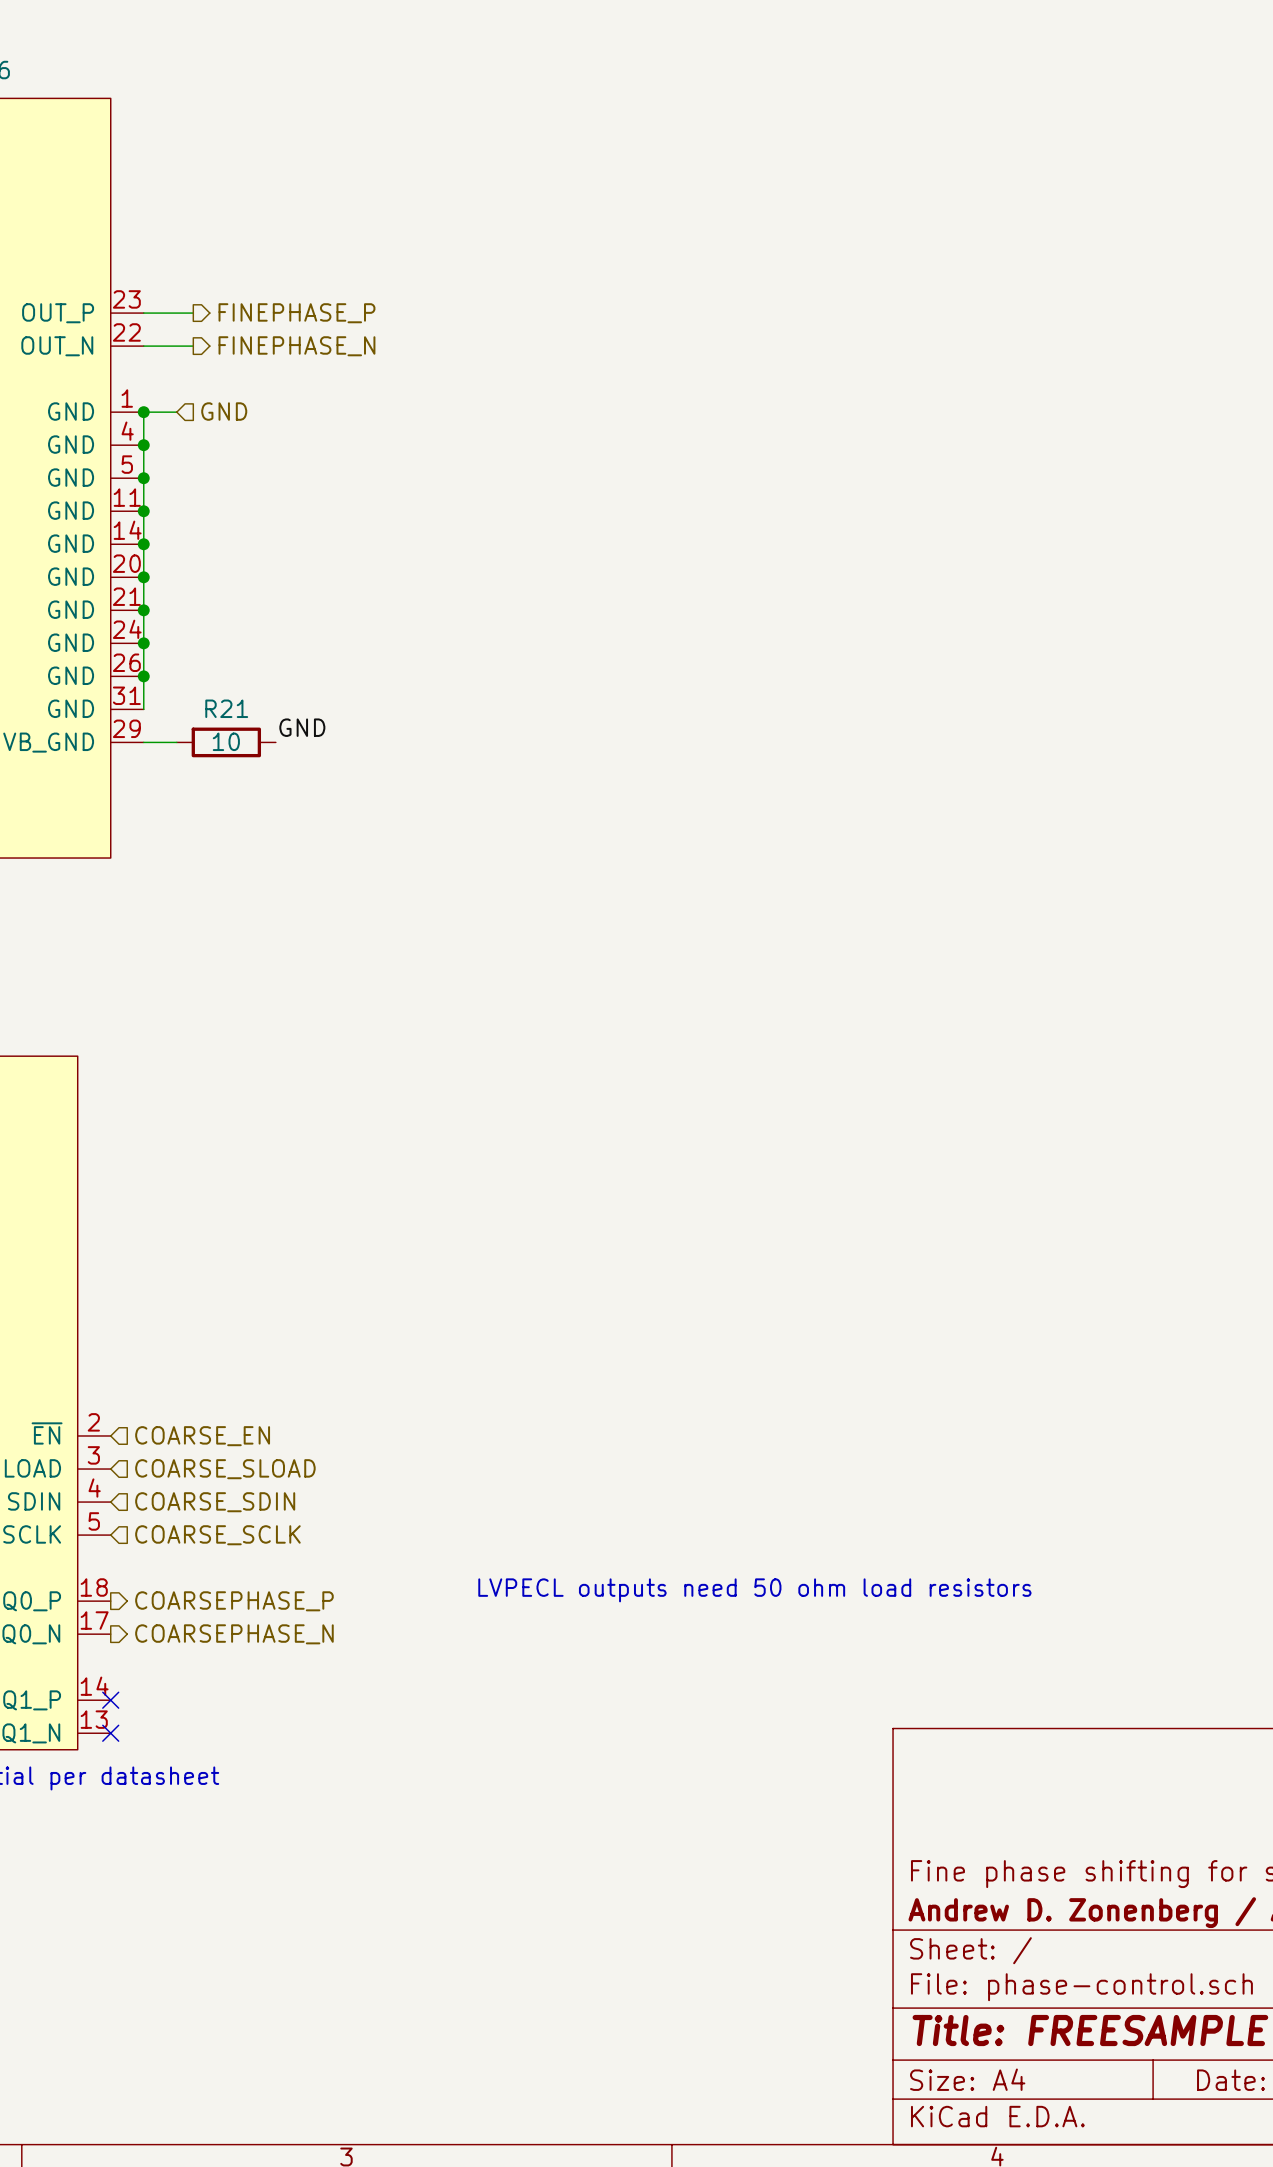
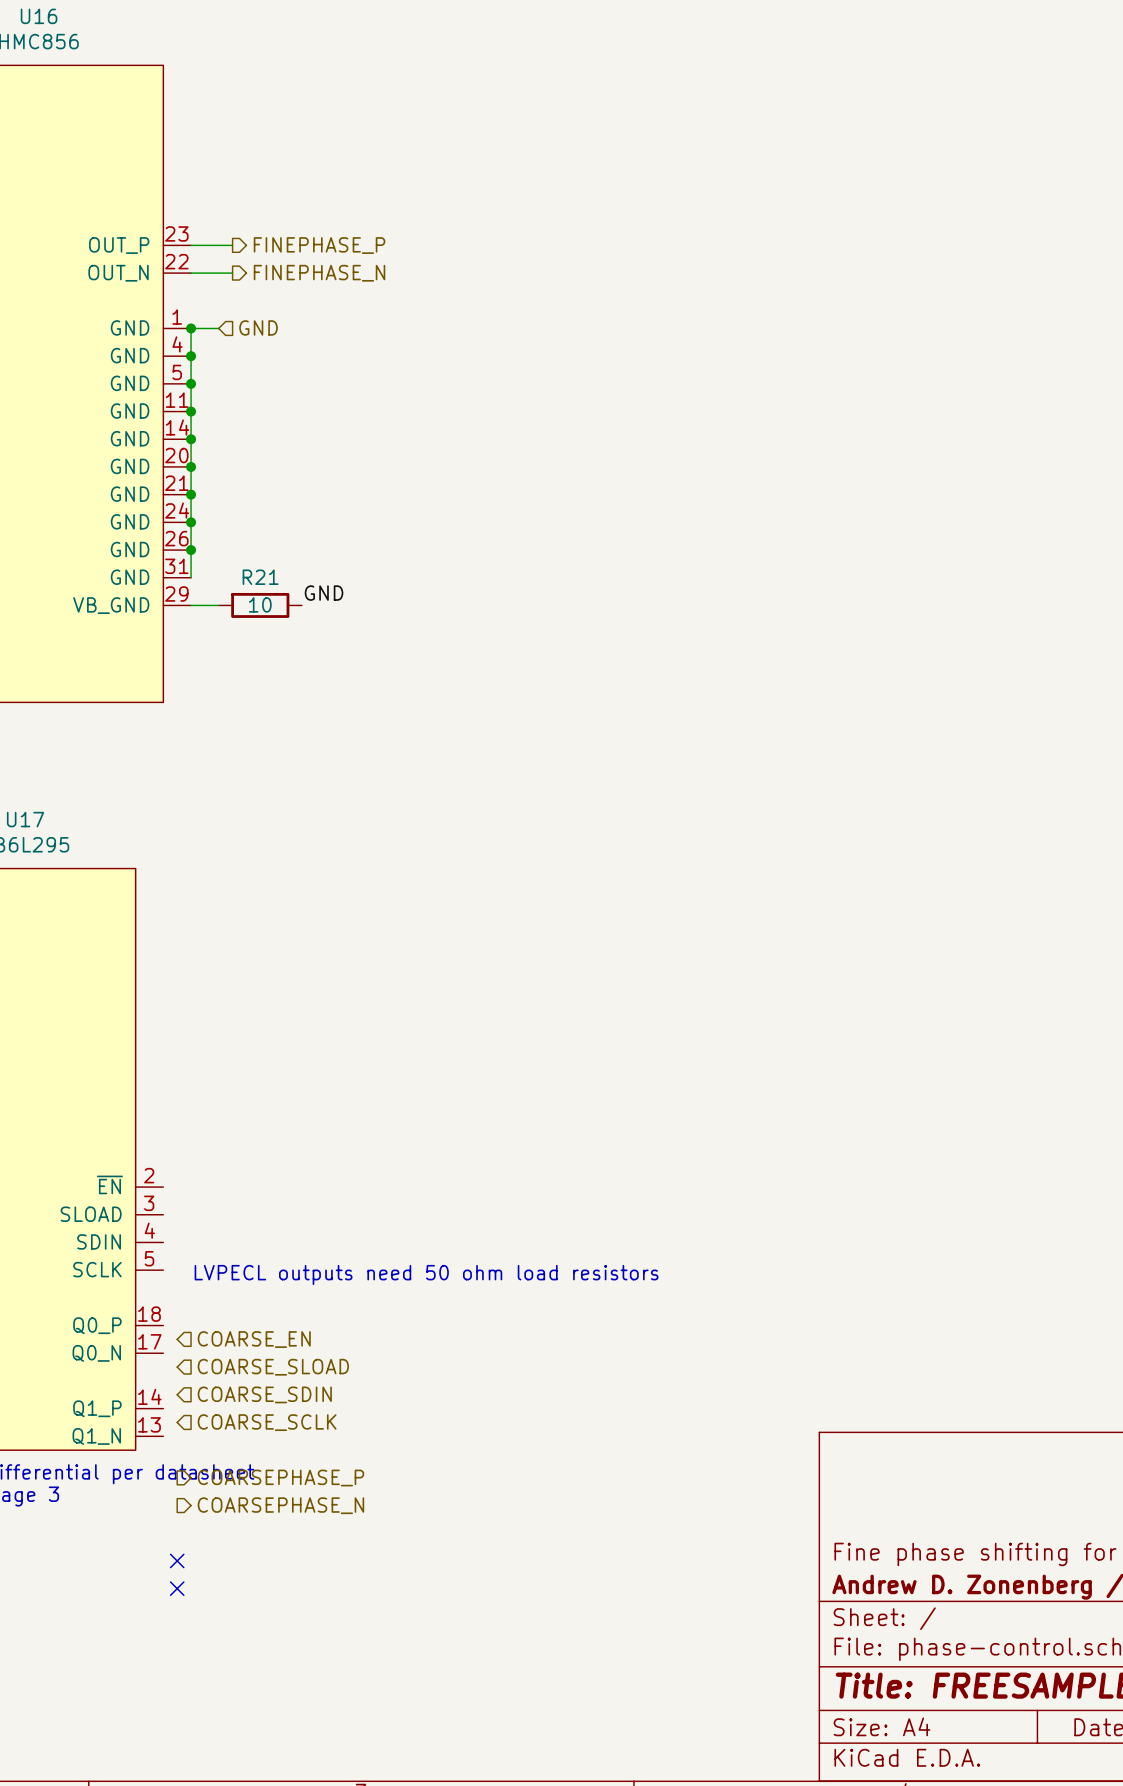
hierarchical label position: COARSE_EN (202, 1436) -> COARSE_EN (254, 1339)
hierarchical label position: COARSE_SLOAD (225, 1469) -> COARSE_SLOAD (273, 1367)
hierarchical label position: COARSE_SDIN (215, 1502) -> COARSE_SDIN (264, 1394)
hierarchical label position: COARSE_SCLK (217, 1535) -> COARSE_SCLK (267, 1422)
text: none -> LVPECL outputs need 50 ohm load resistors (426, 1274)
text: LVPECL outputs need 50 ohm load resistors (754, 1590) -> none
hierarchical label position: COARSEPHASE_P (234, 1601) -> COARSEPHASE_P (280, 1478)
hierarchical label position: COARSEPHASE_N (234, 1634) -> COARSEPHASE_N (280, 1505)
no-connect mark: (110, 1700) -> none
no-connect mark: (110, 1733) -> none
no-connect mark: none -> (177, 1560)
no-connect mark: none -> (177, 1588)

